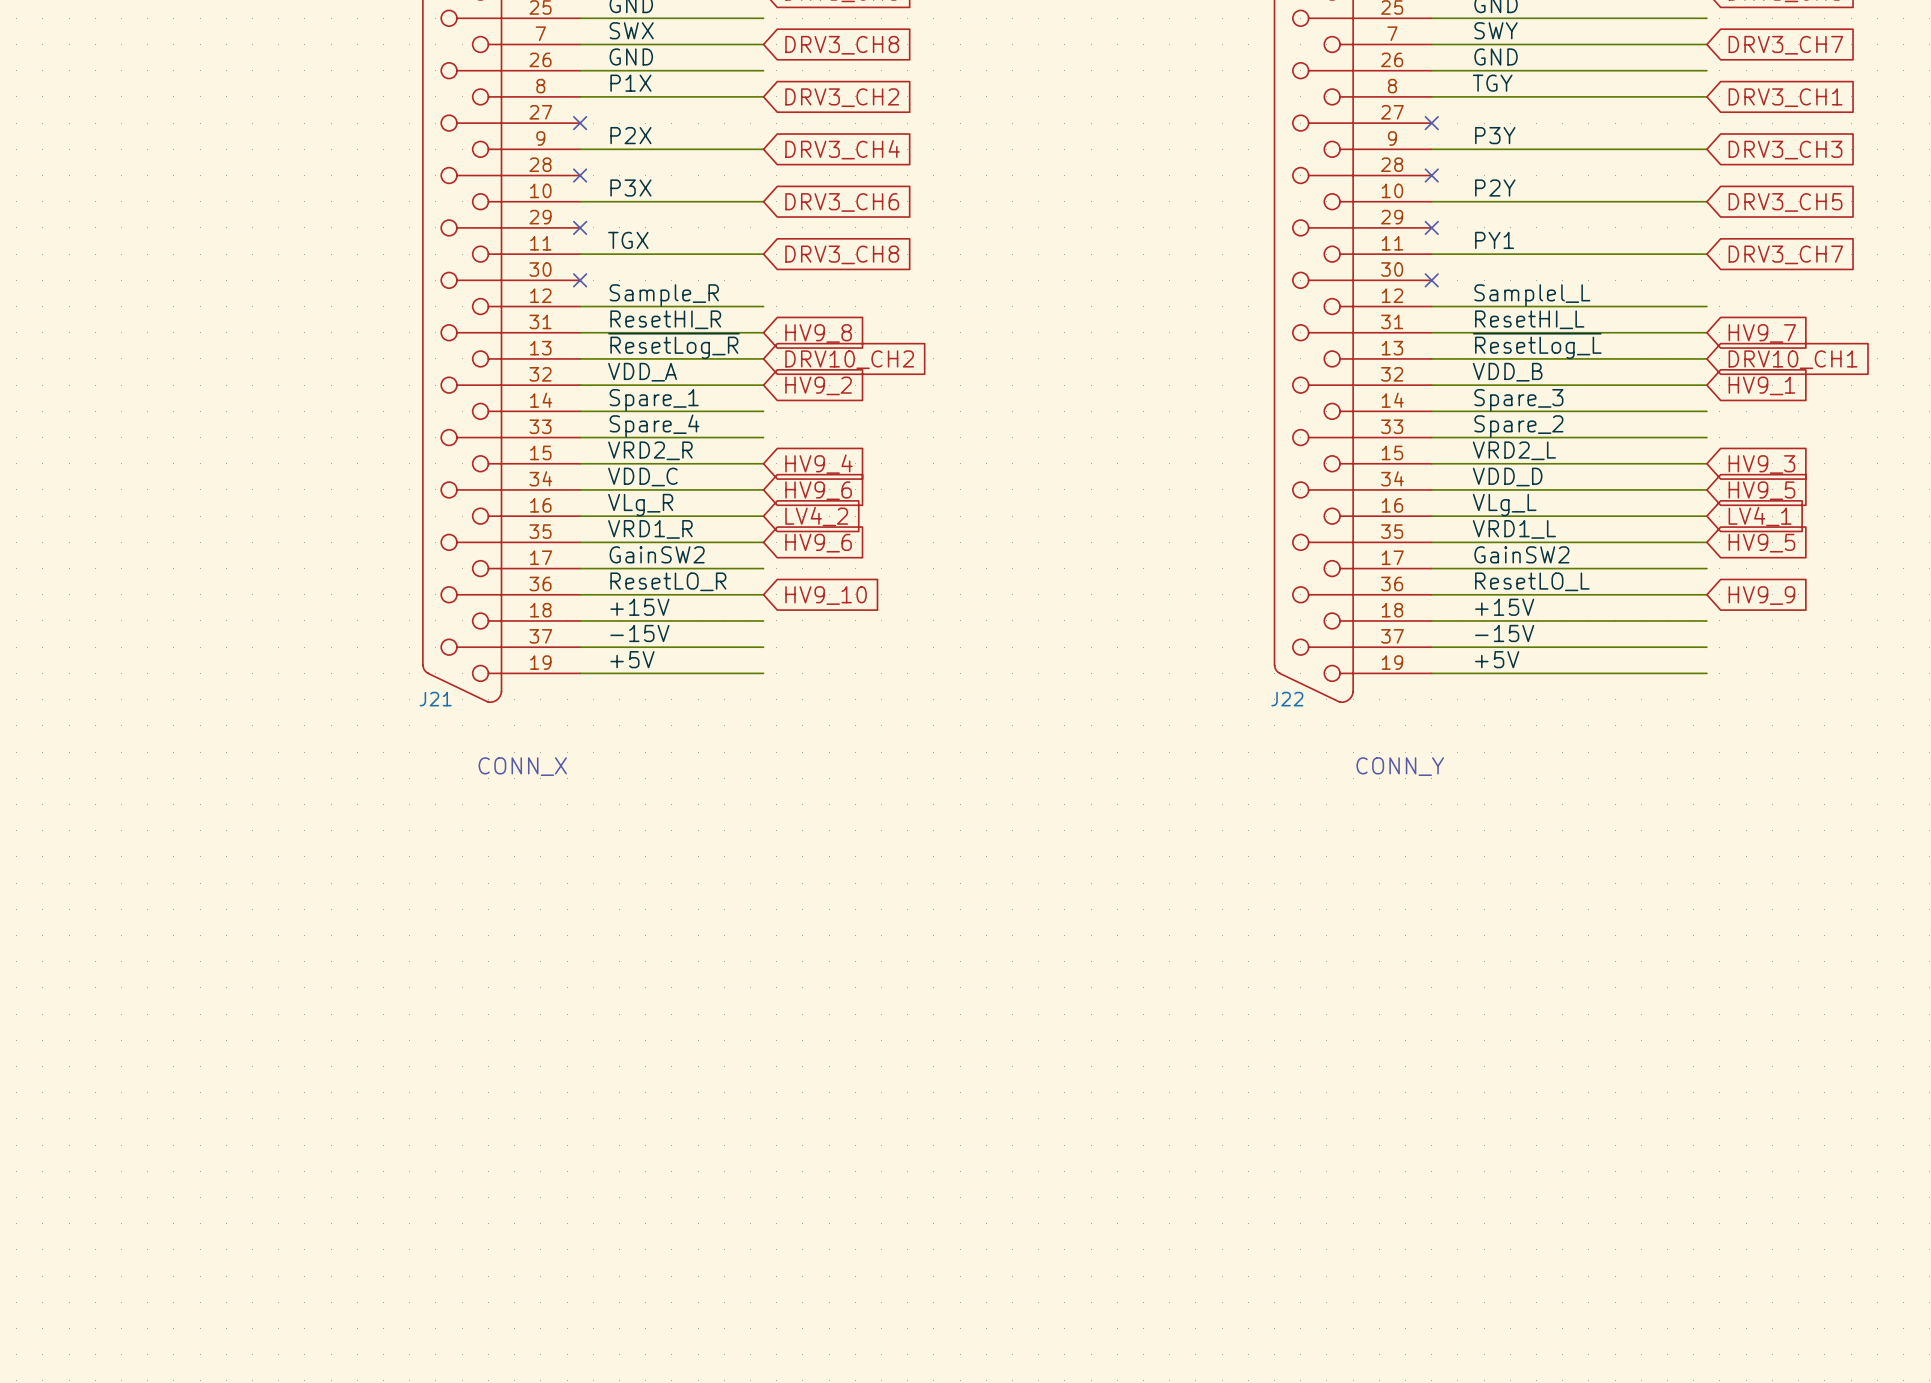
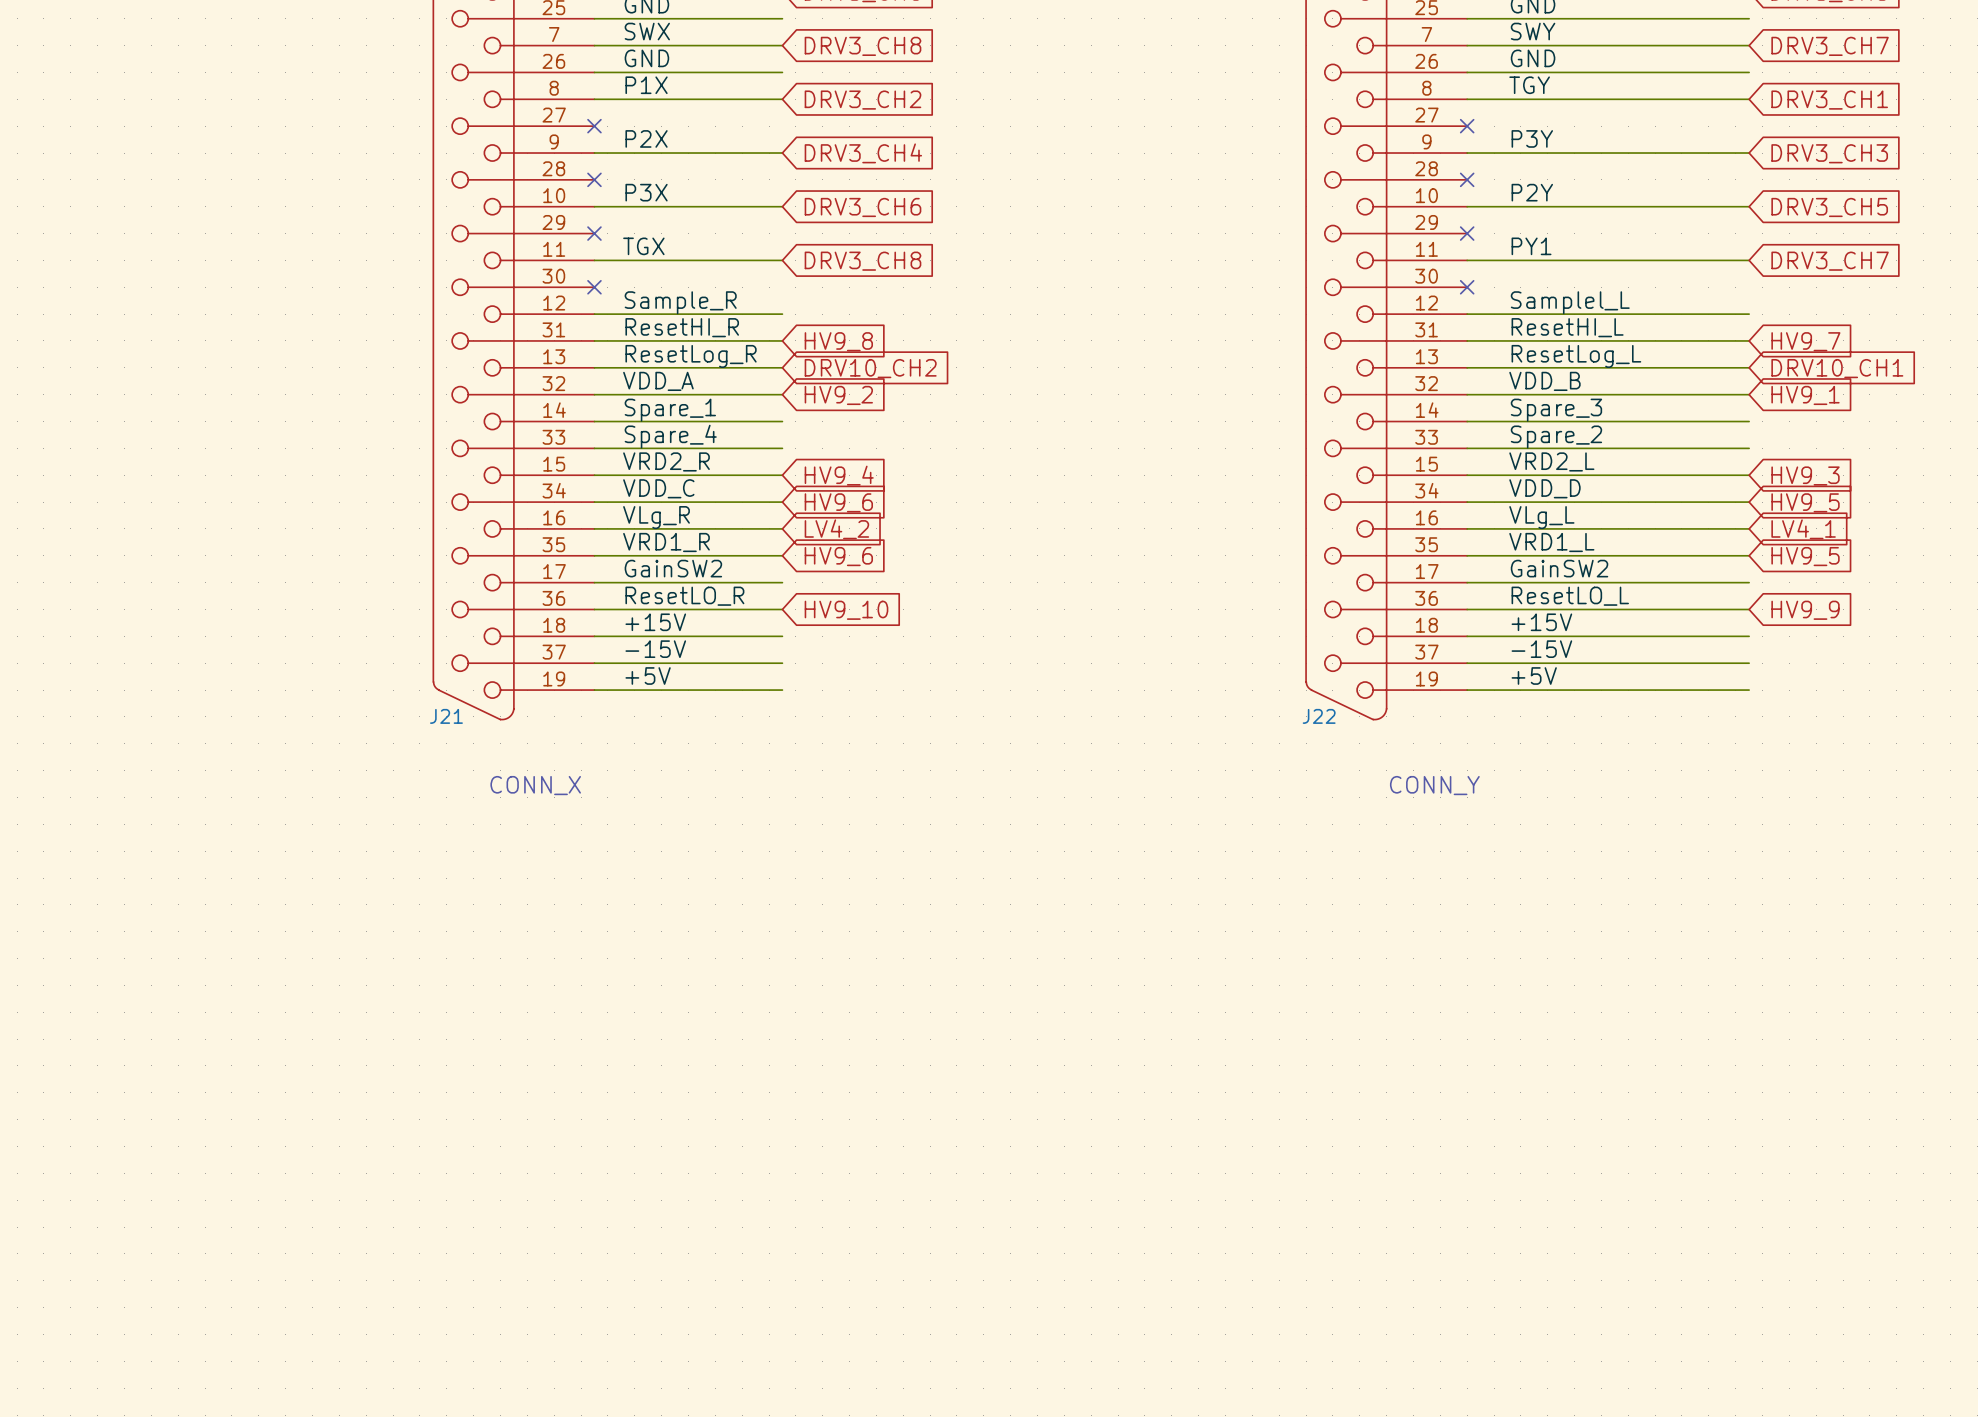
label: ~{ResetLog_R} (673, 346) -> ResetLog_R (691, 356)
label: ~{ResetLog_L} (1537, 346) -> ResetLog_L (1576, 356)

